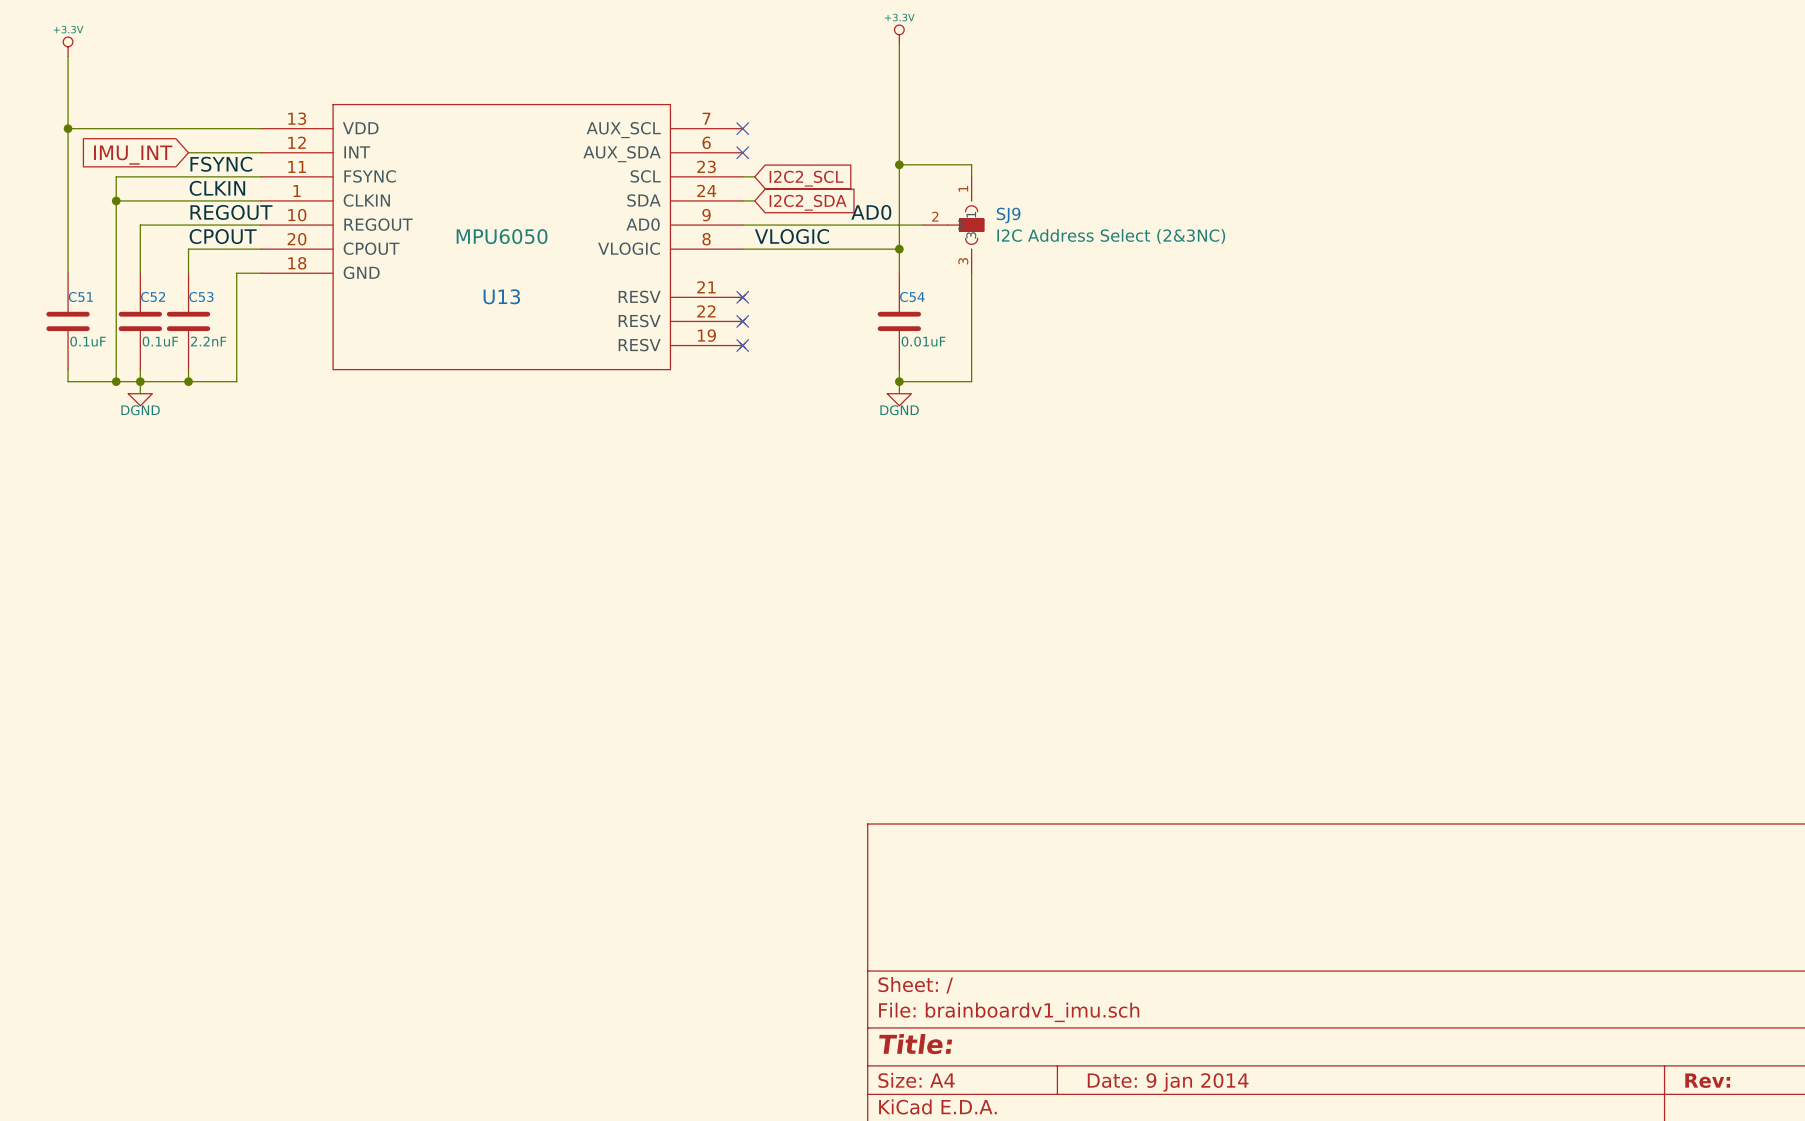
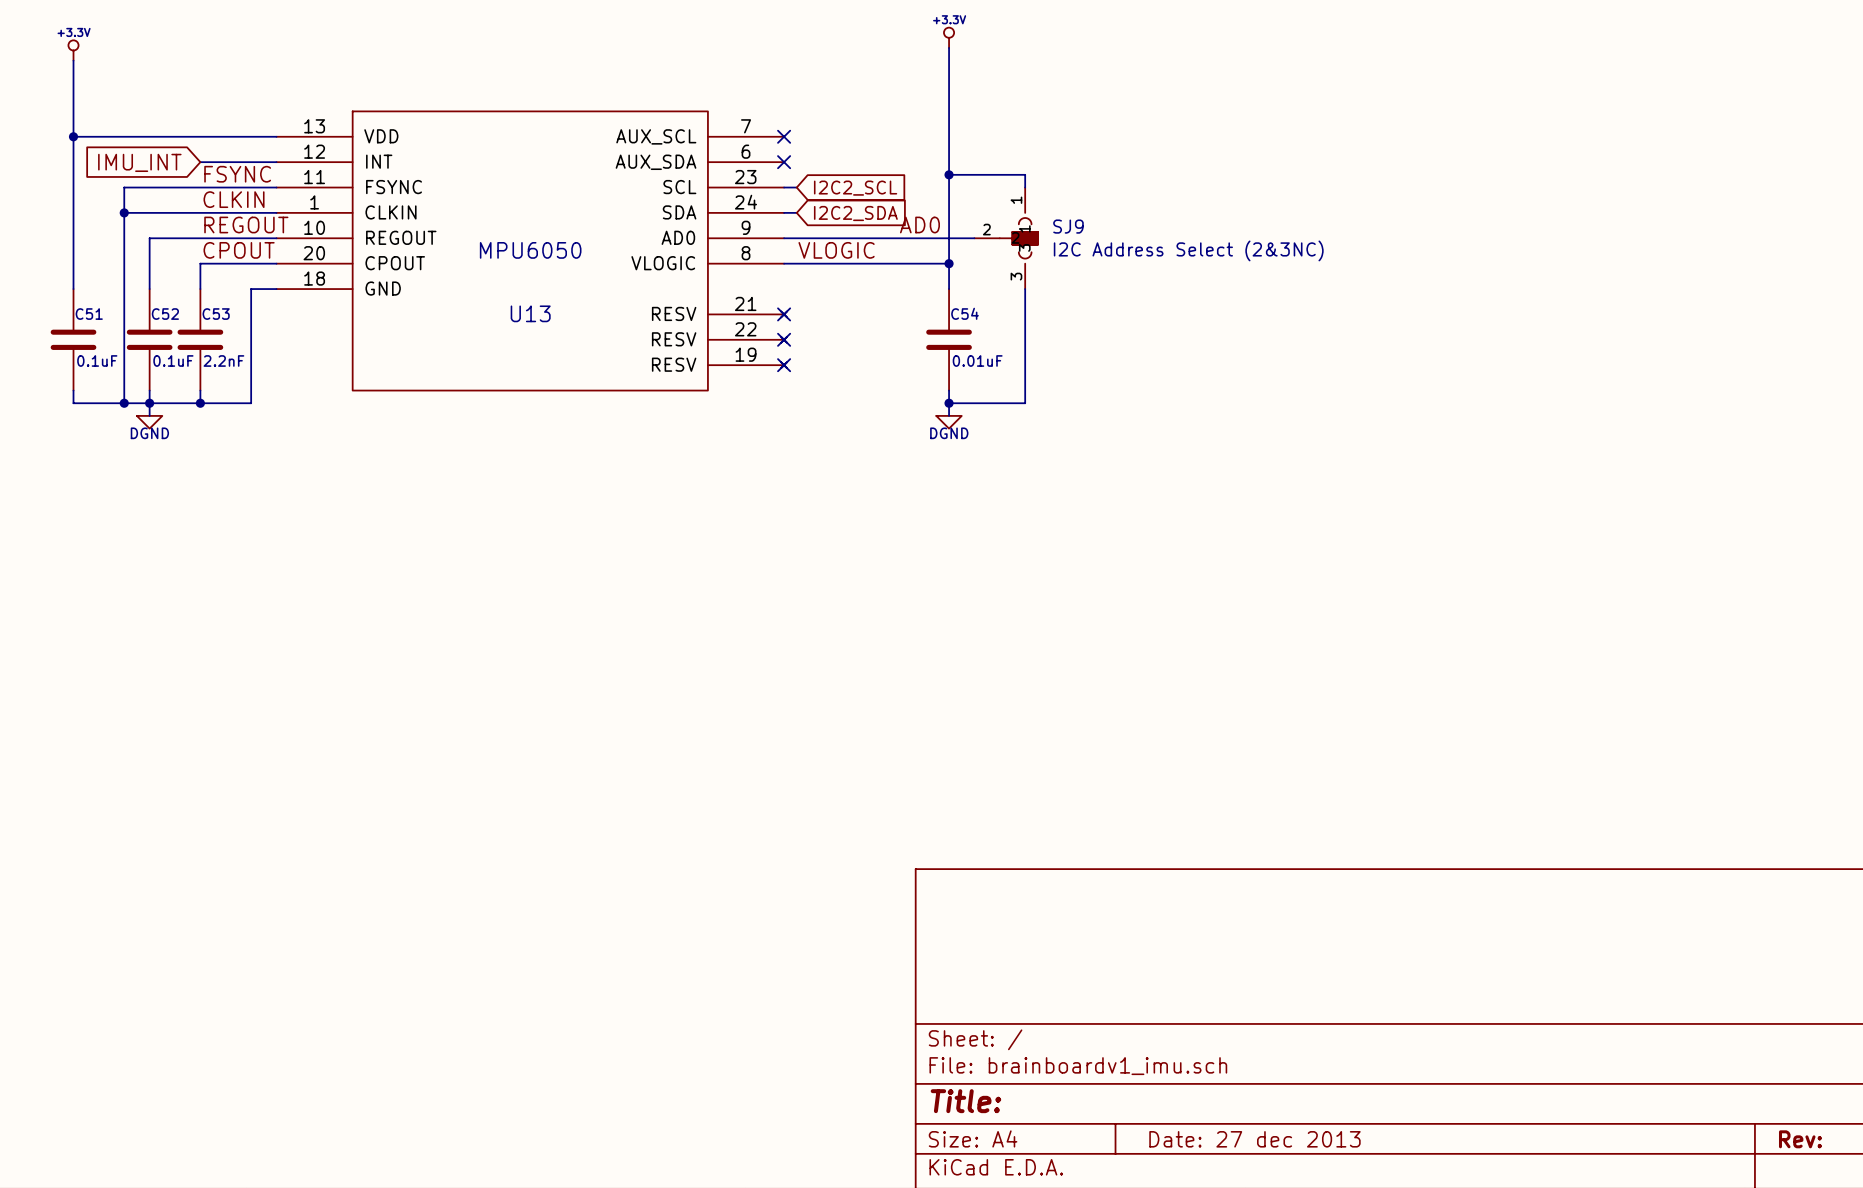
title block: Date: 9 jan 2014 (1168, 1082) -> Date: 27 dec 2013 (1254, 1139)

